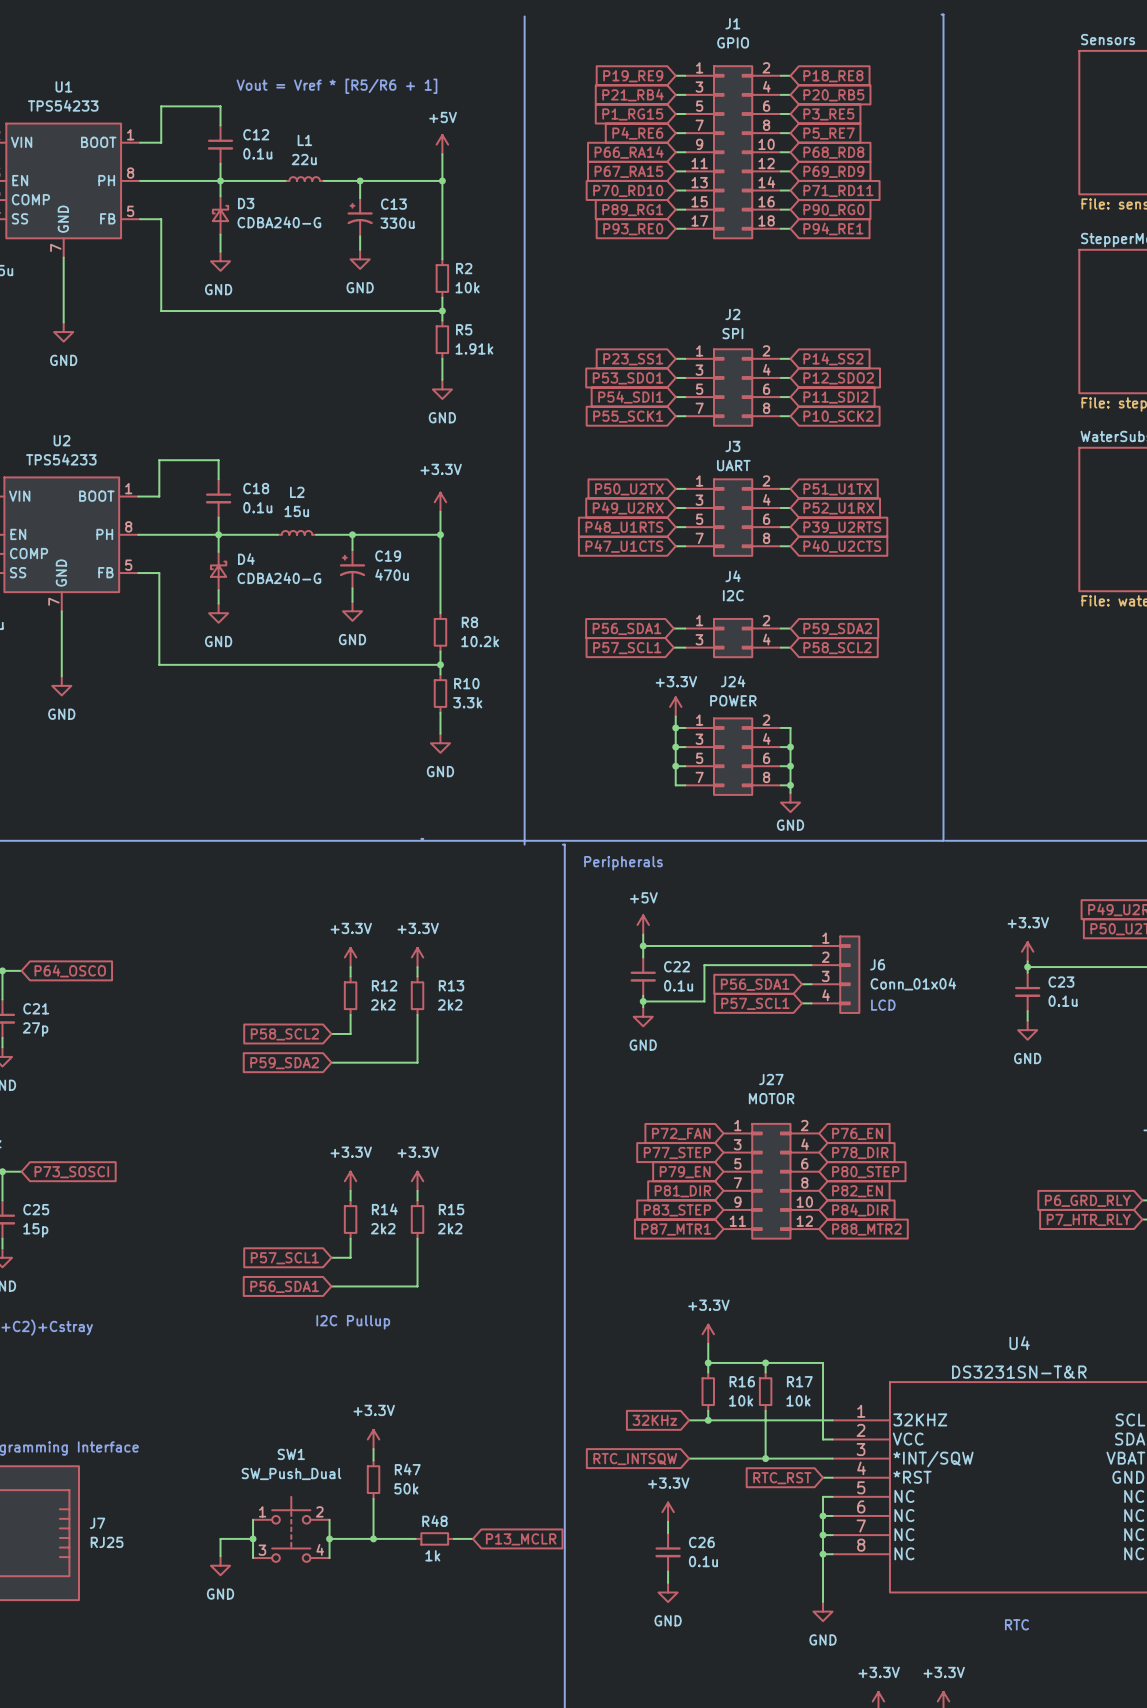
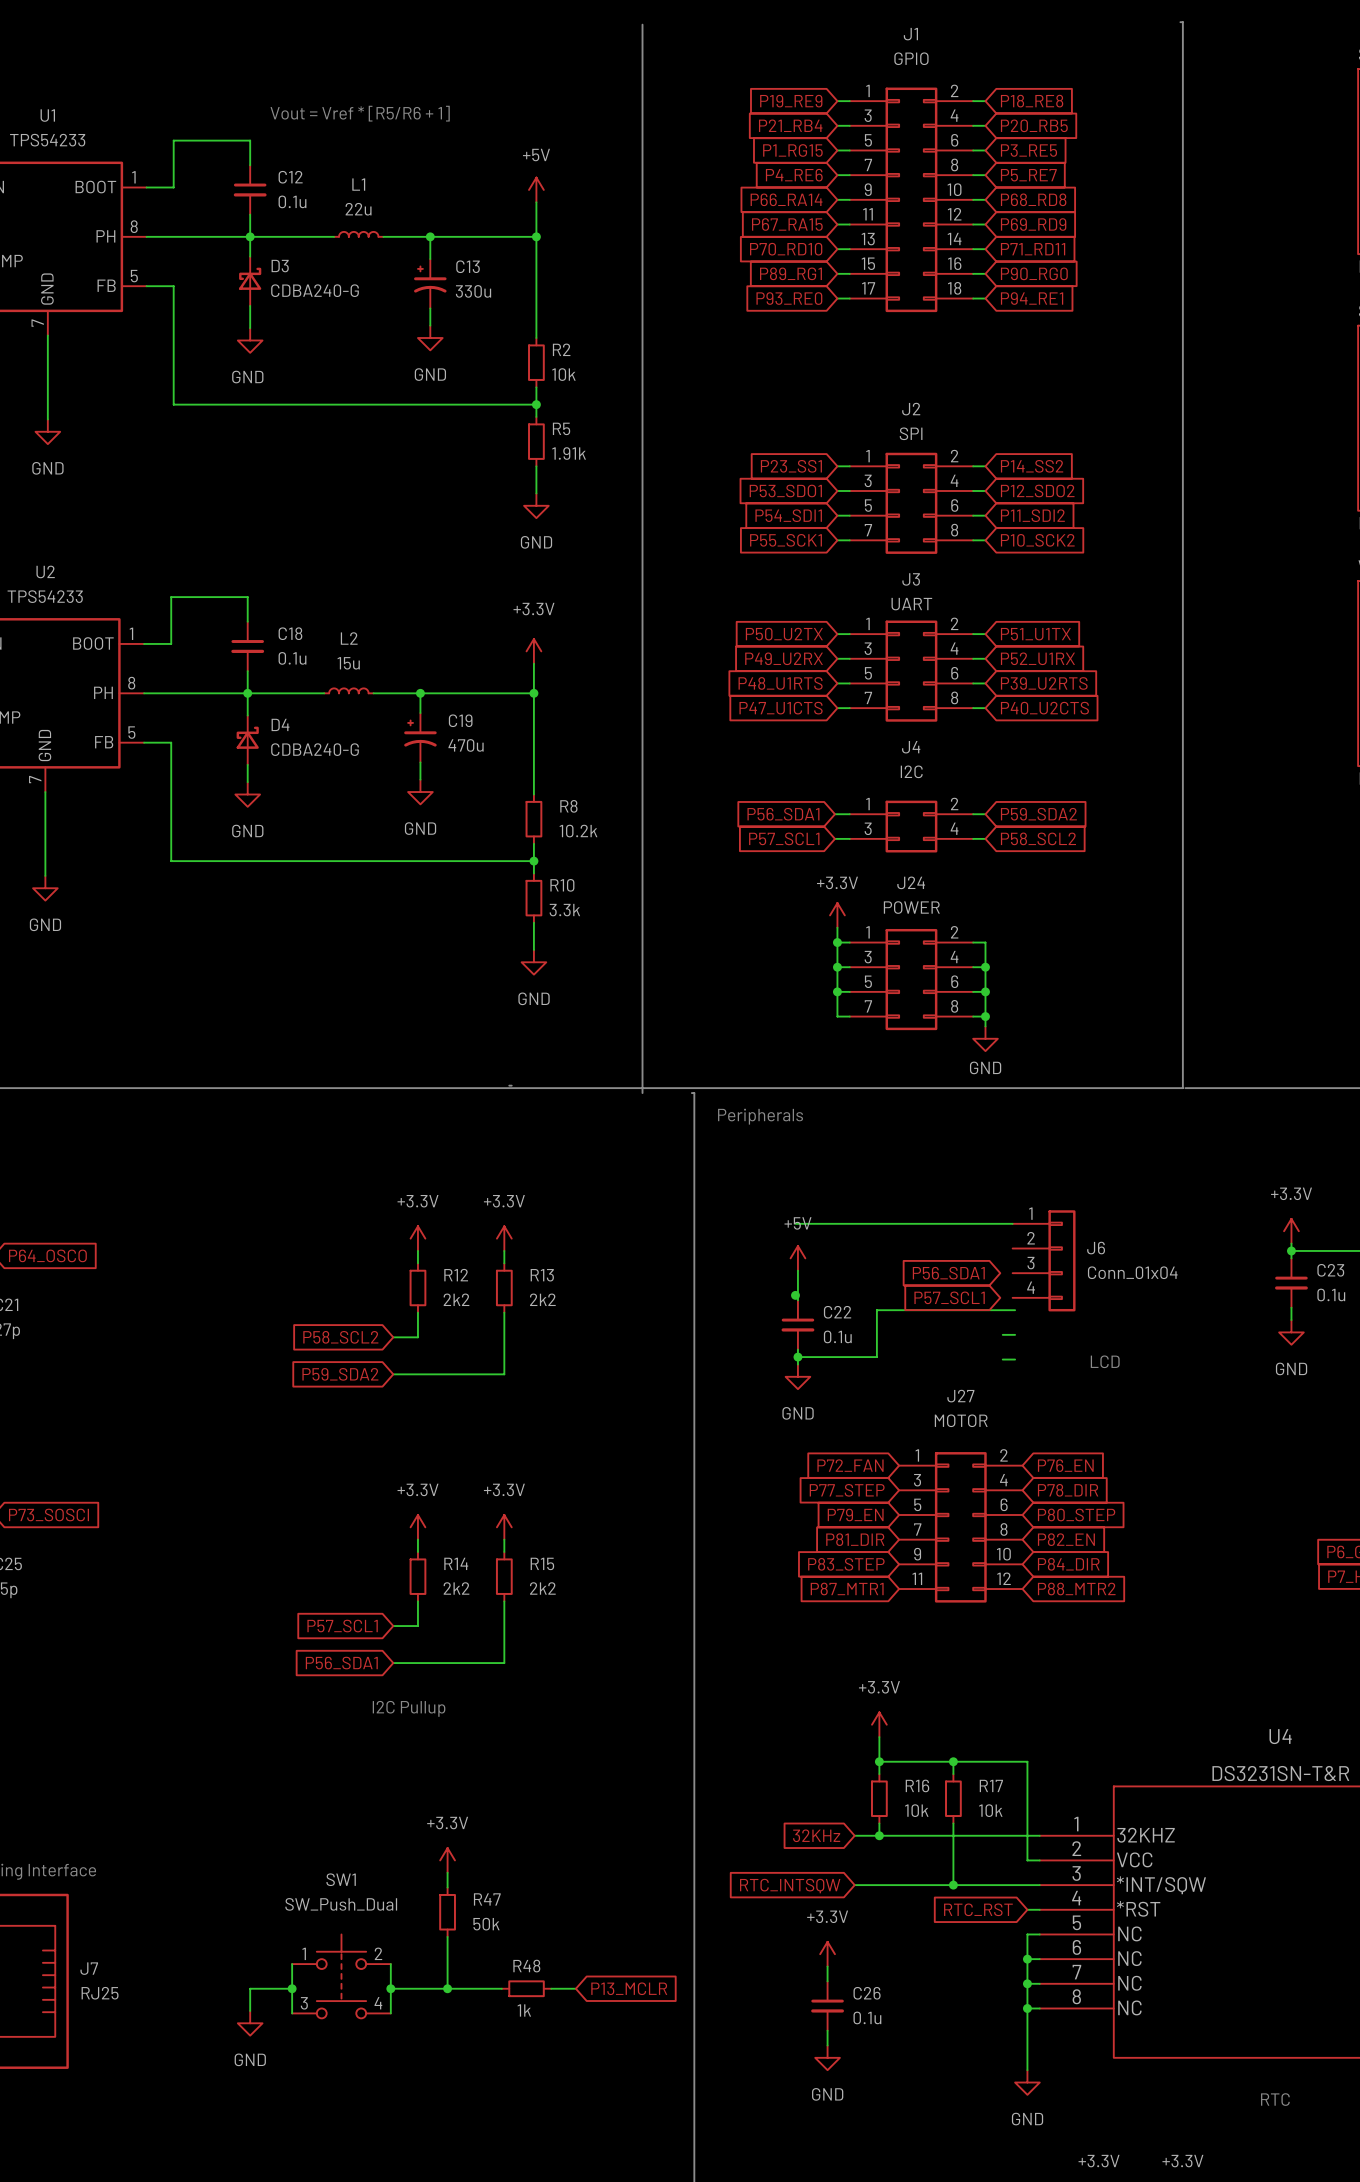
power symbol position: +5V (643, 924) -> +5V (797, 1258)
wire: (643, 934) (643, 957) -> (797, 1270) (797, 1300)
junction: (643, 946) -> none
wire: (811, 965) (704, 965) (704, 1001) (643, 1001) -> (1015, 1310) (876, 1310) (876, 1357) (797, 1357)
C22 position: (643, 976) -> (797, 1325)
wire: (801, 984) (811, 984) -> (1002, 1334) (1015, 1334)
wire: (801, 1003) (811, 1003) -> (1002, 1359) (1015, 1359)
text position: LCD (883, 1005) -> LCD (1105, 1361)
power symbol position: GND (643, 1016) -> GND (797, 1376)
junction: none -> (797, 1357)

